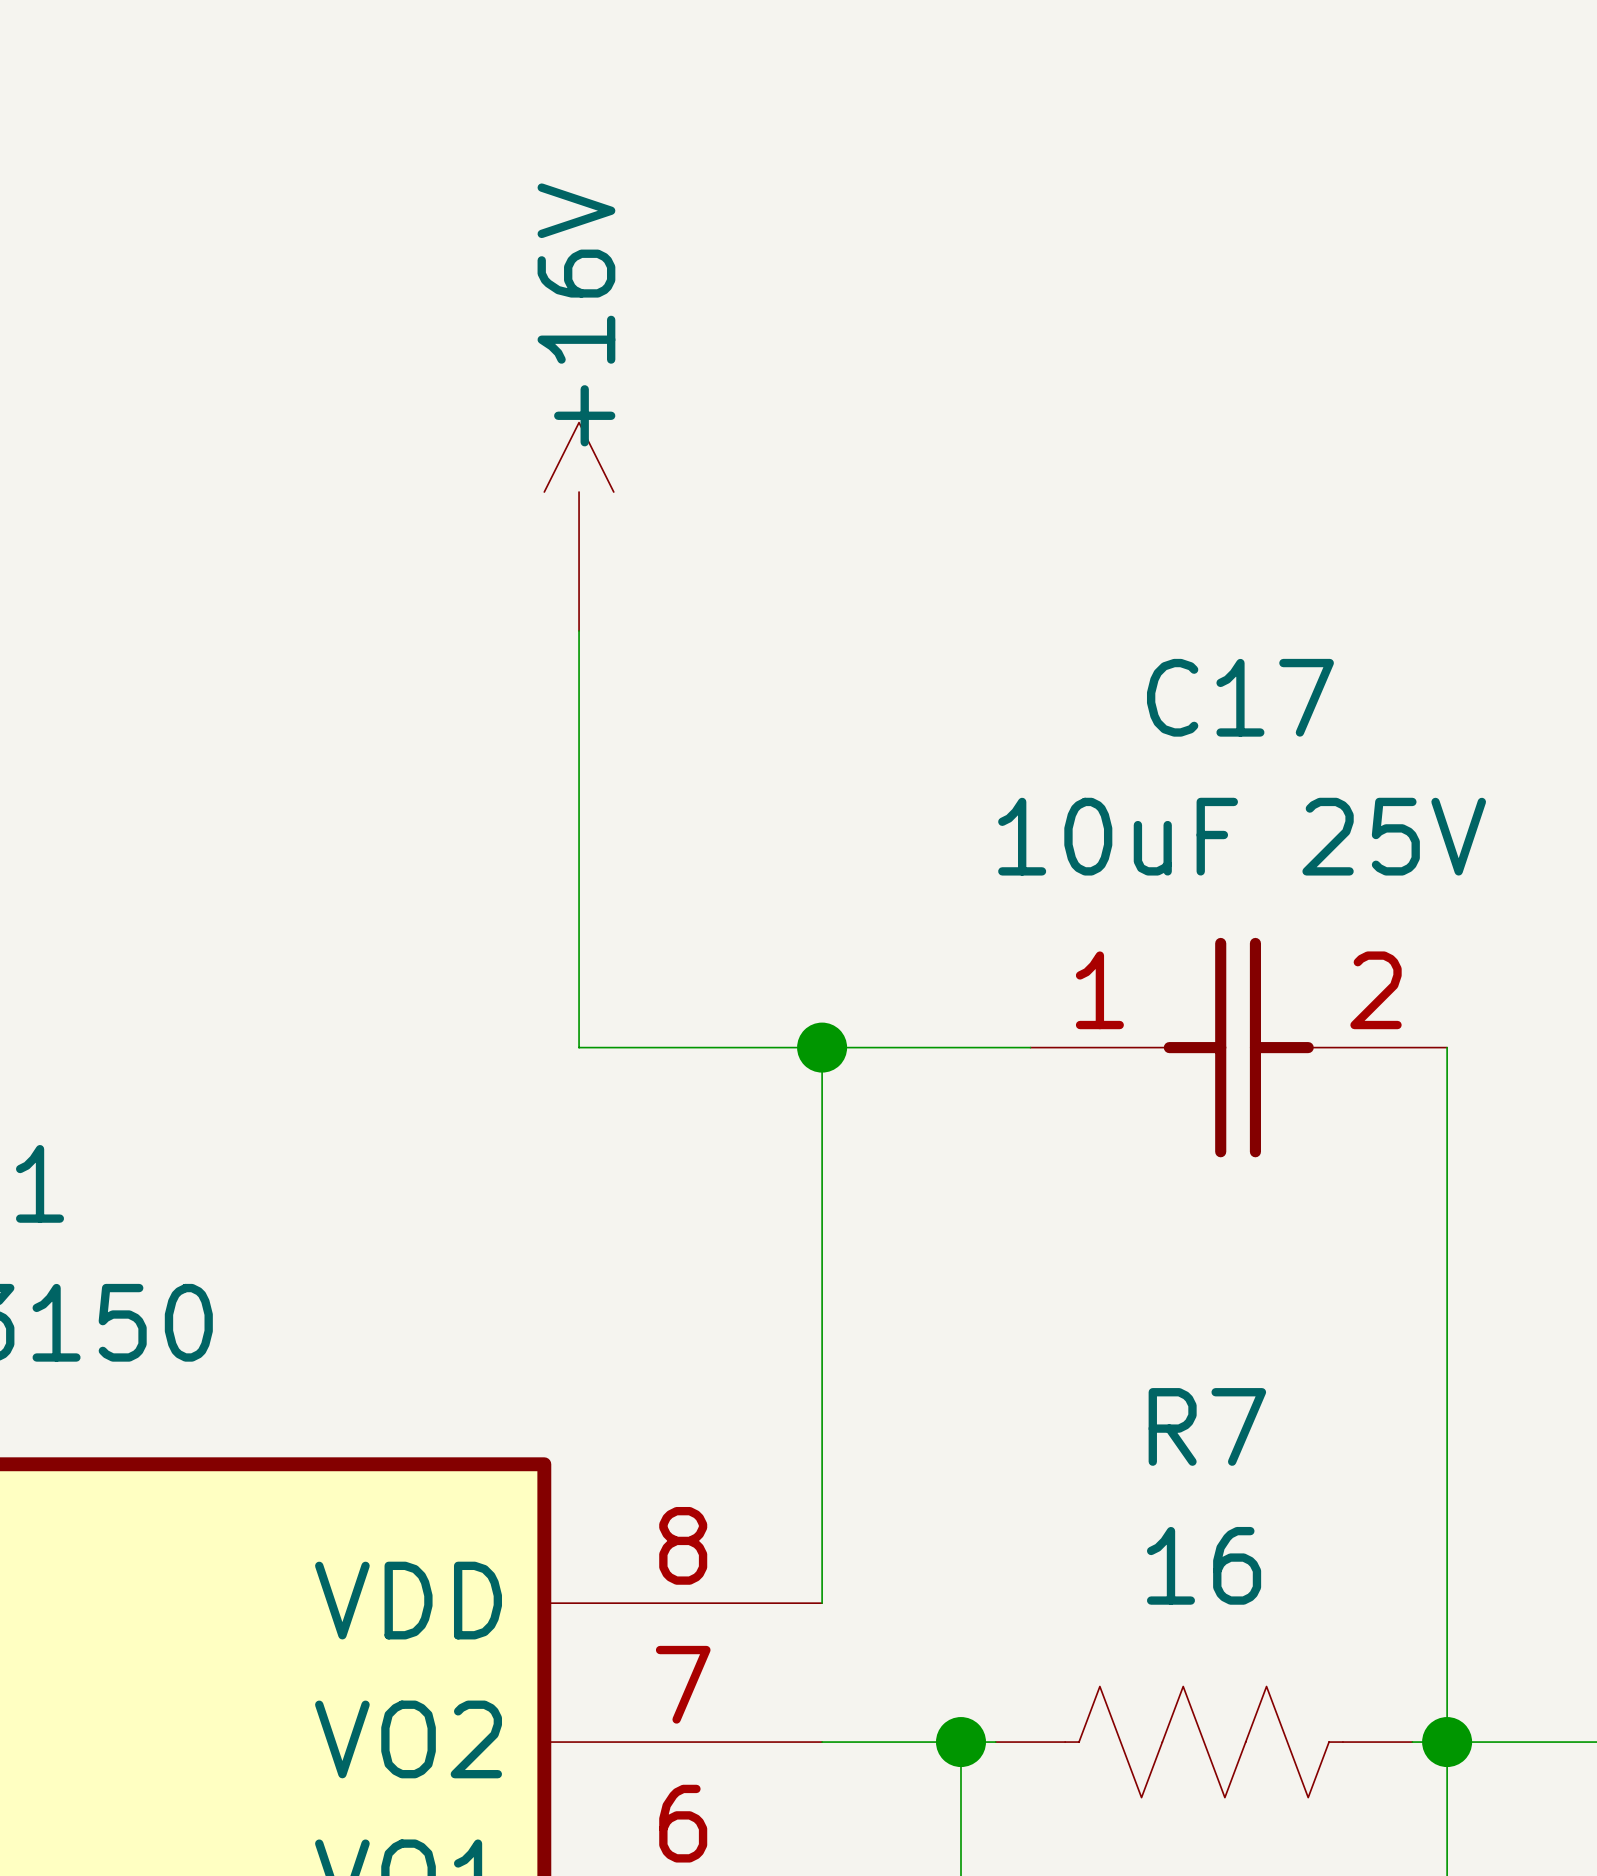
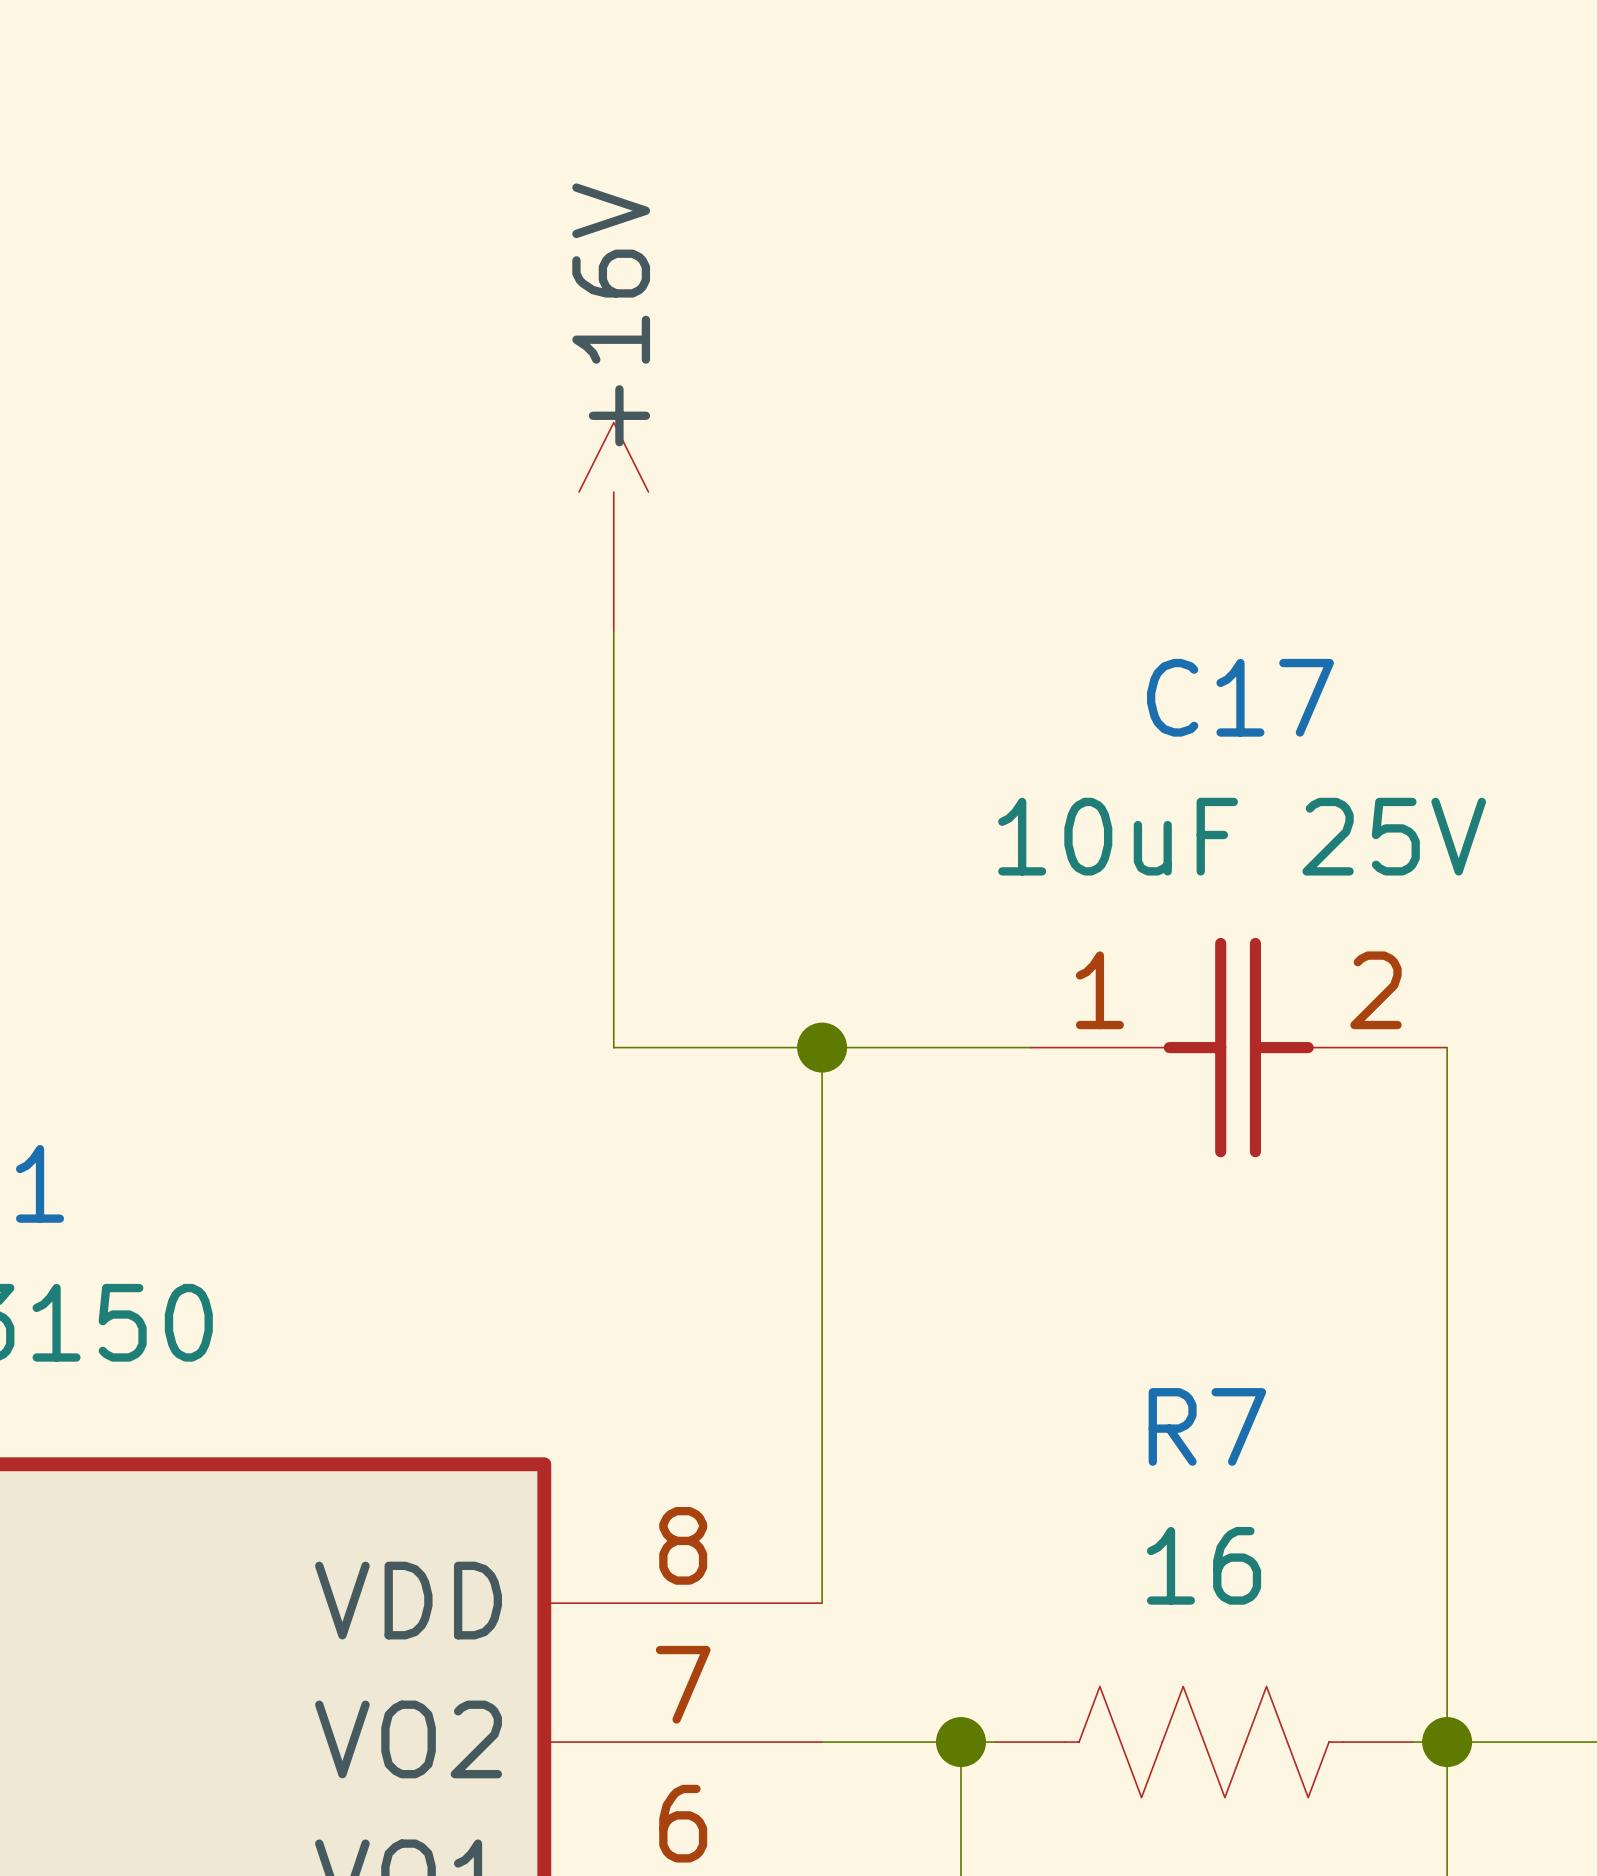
power symbol position: (579, 526) -> (613, 526)
wire: (579, 630) (579, 1047) (613, 1047) -> (613, 630) (613, 1047)

